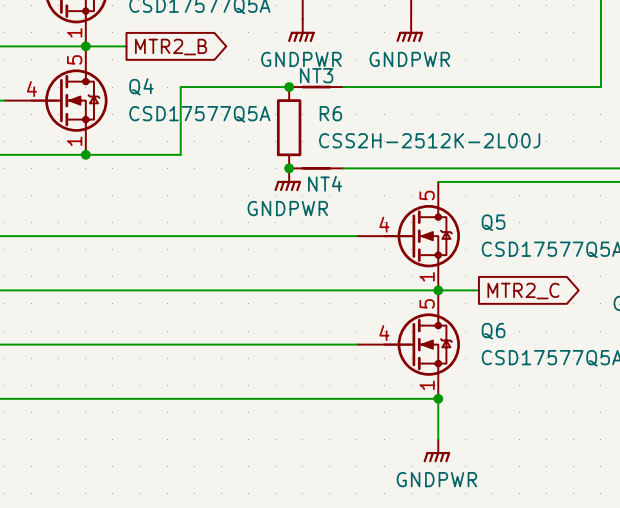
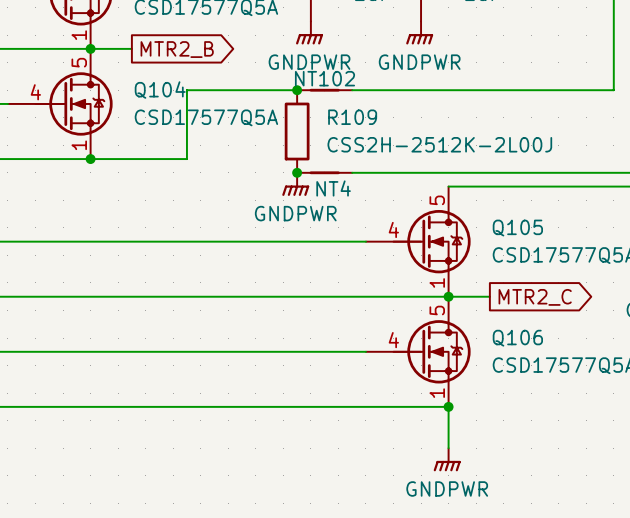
NT3 name: NT3 (316, 75) -> NT102 (324, 78)
Q4 name: Q4 (141, 86) -> Q104 (160, 90)
R6 name: R6 (330, 113) -> R109 (352, 117)
Q5 name: Q5 (493, 222) -> Q105 (517, 228)
Q6 name: Q6 (493, 331) -> Q106 (517, 338)

